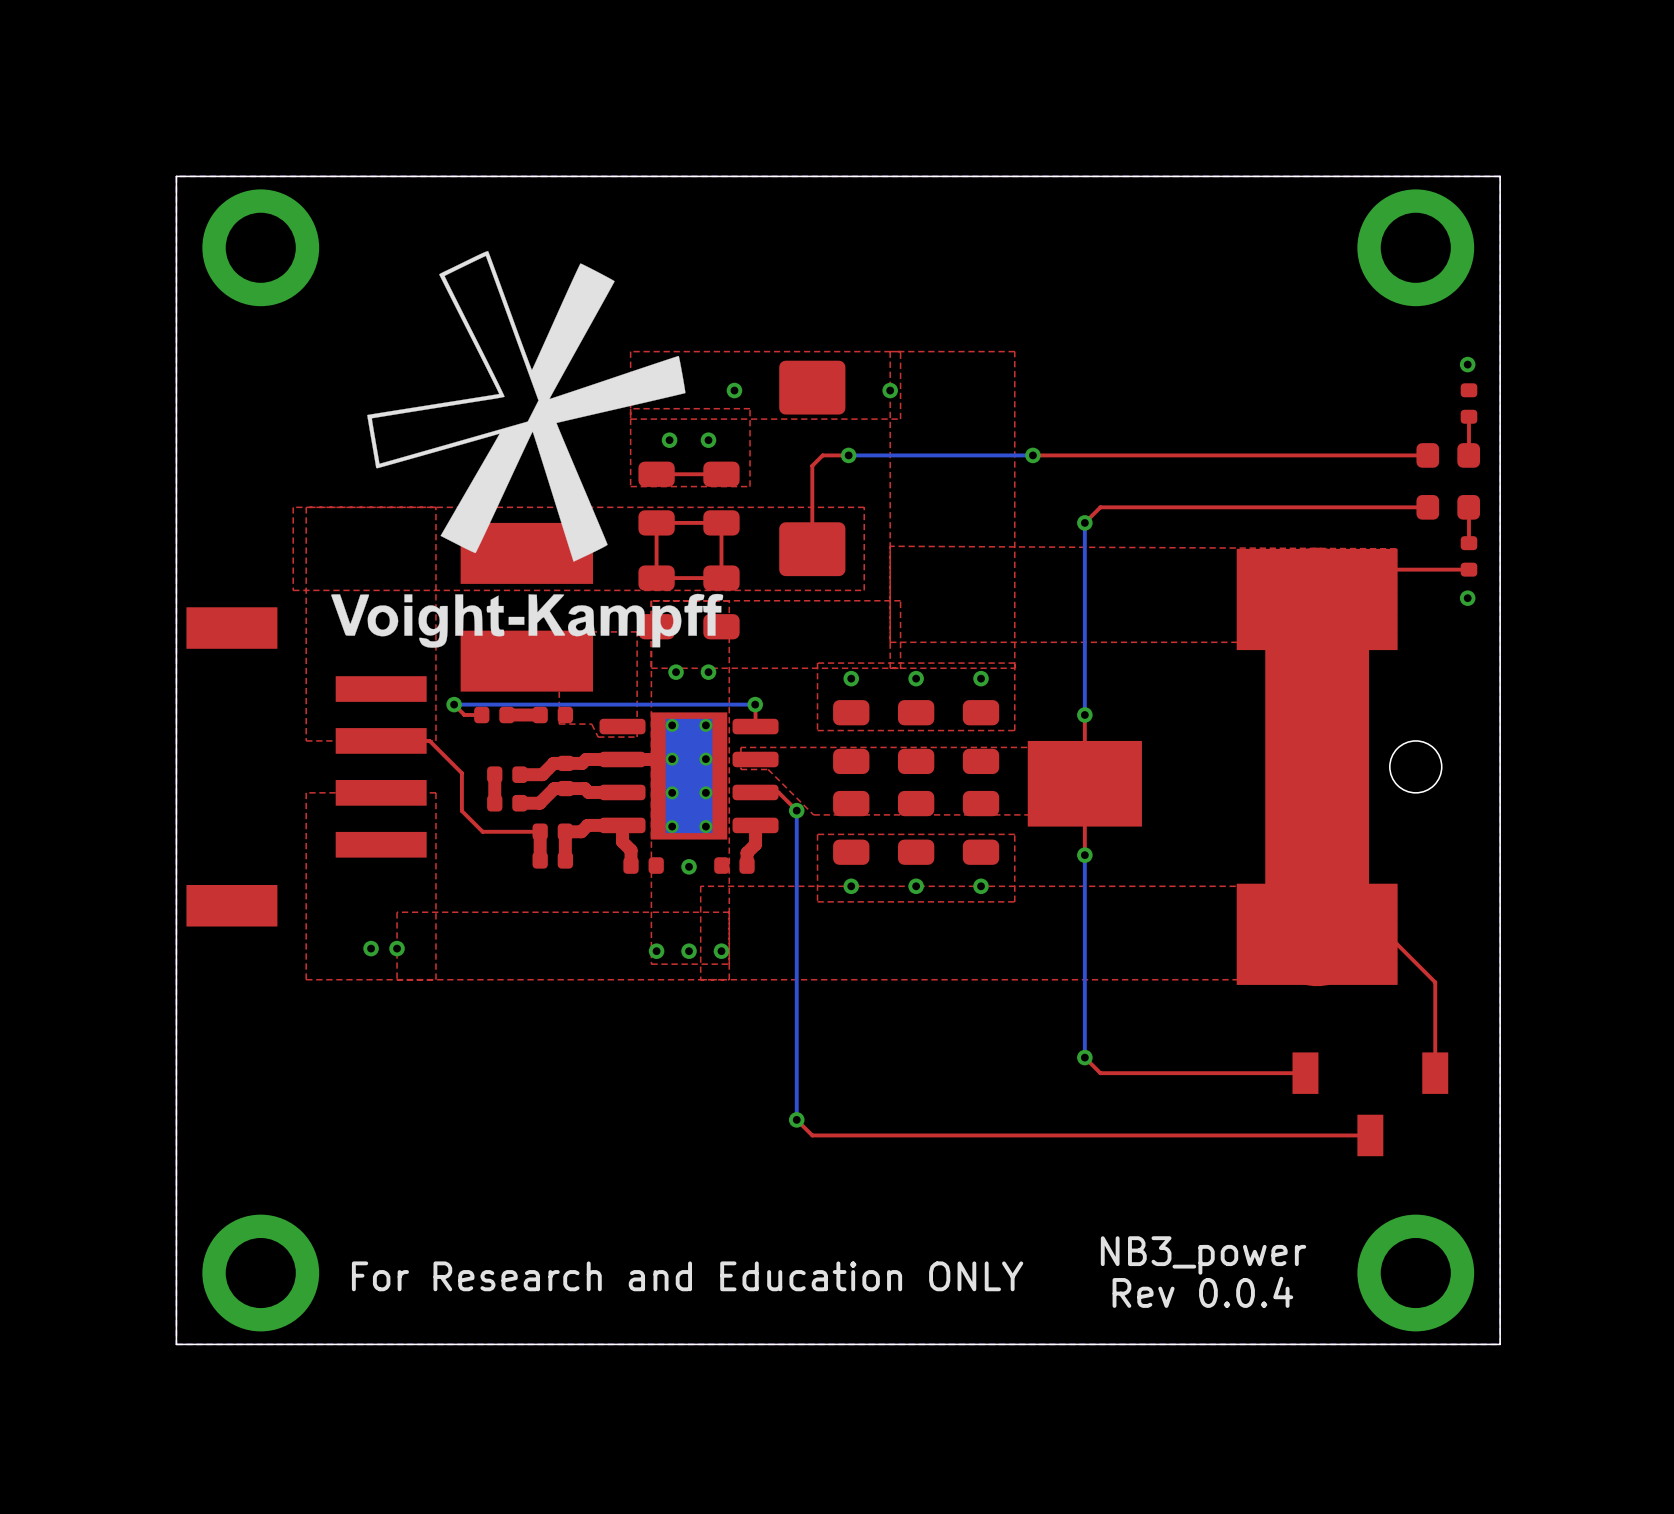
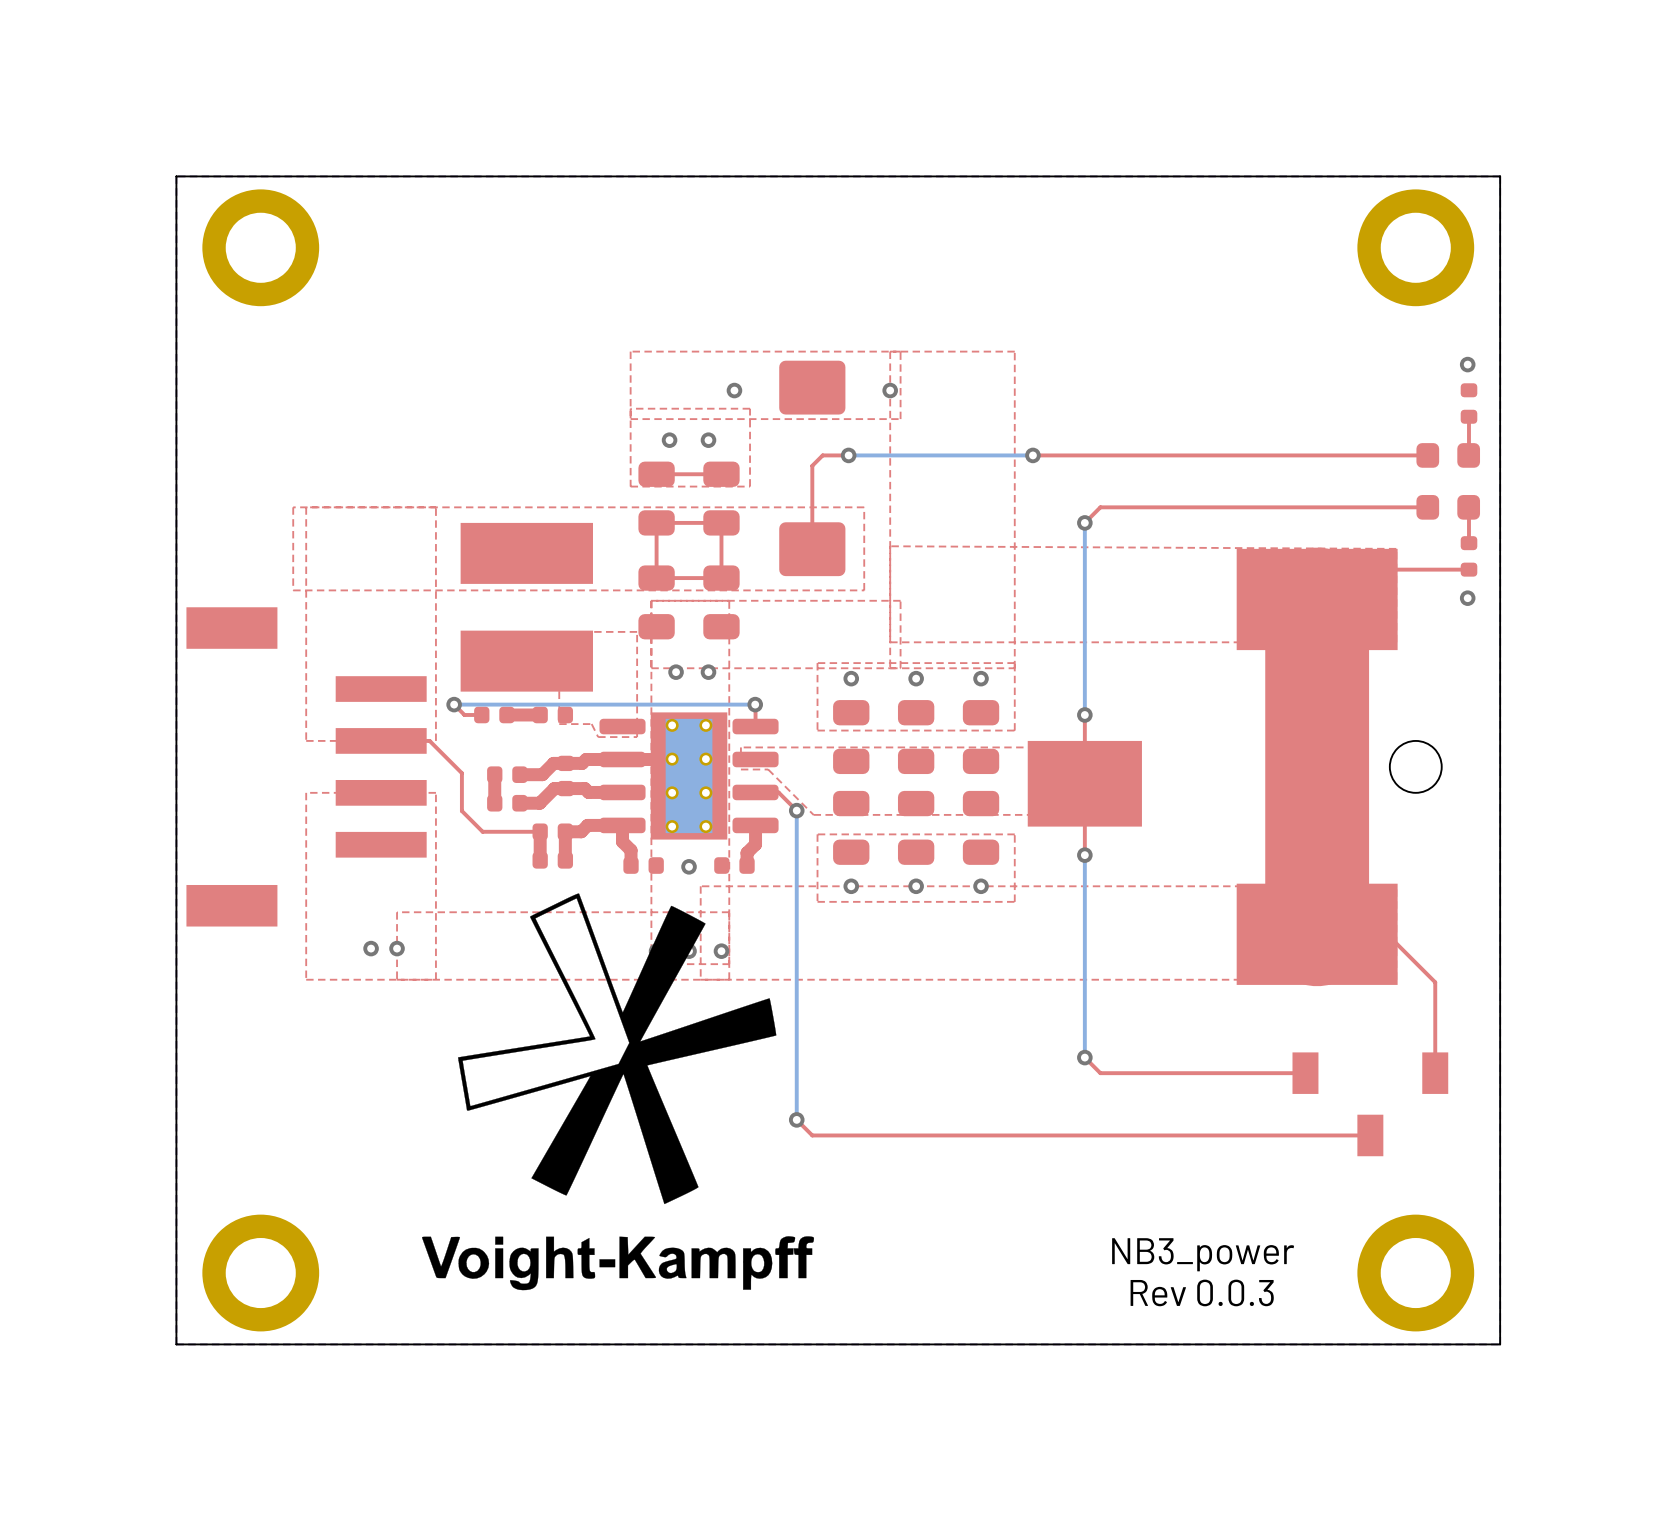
drawing position: (527, 449) -> (618, 1091)
text: For Research and Education ONLY (687, 1276) -> none
text: Rev 0.0.4 (1202, 1292) -> Rev 0.0.3 (1202, 1292)

